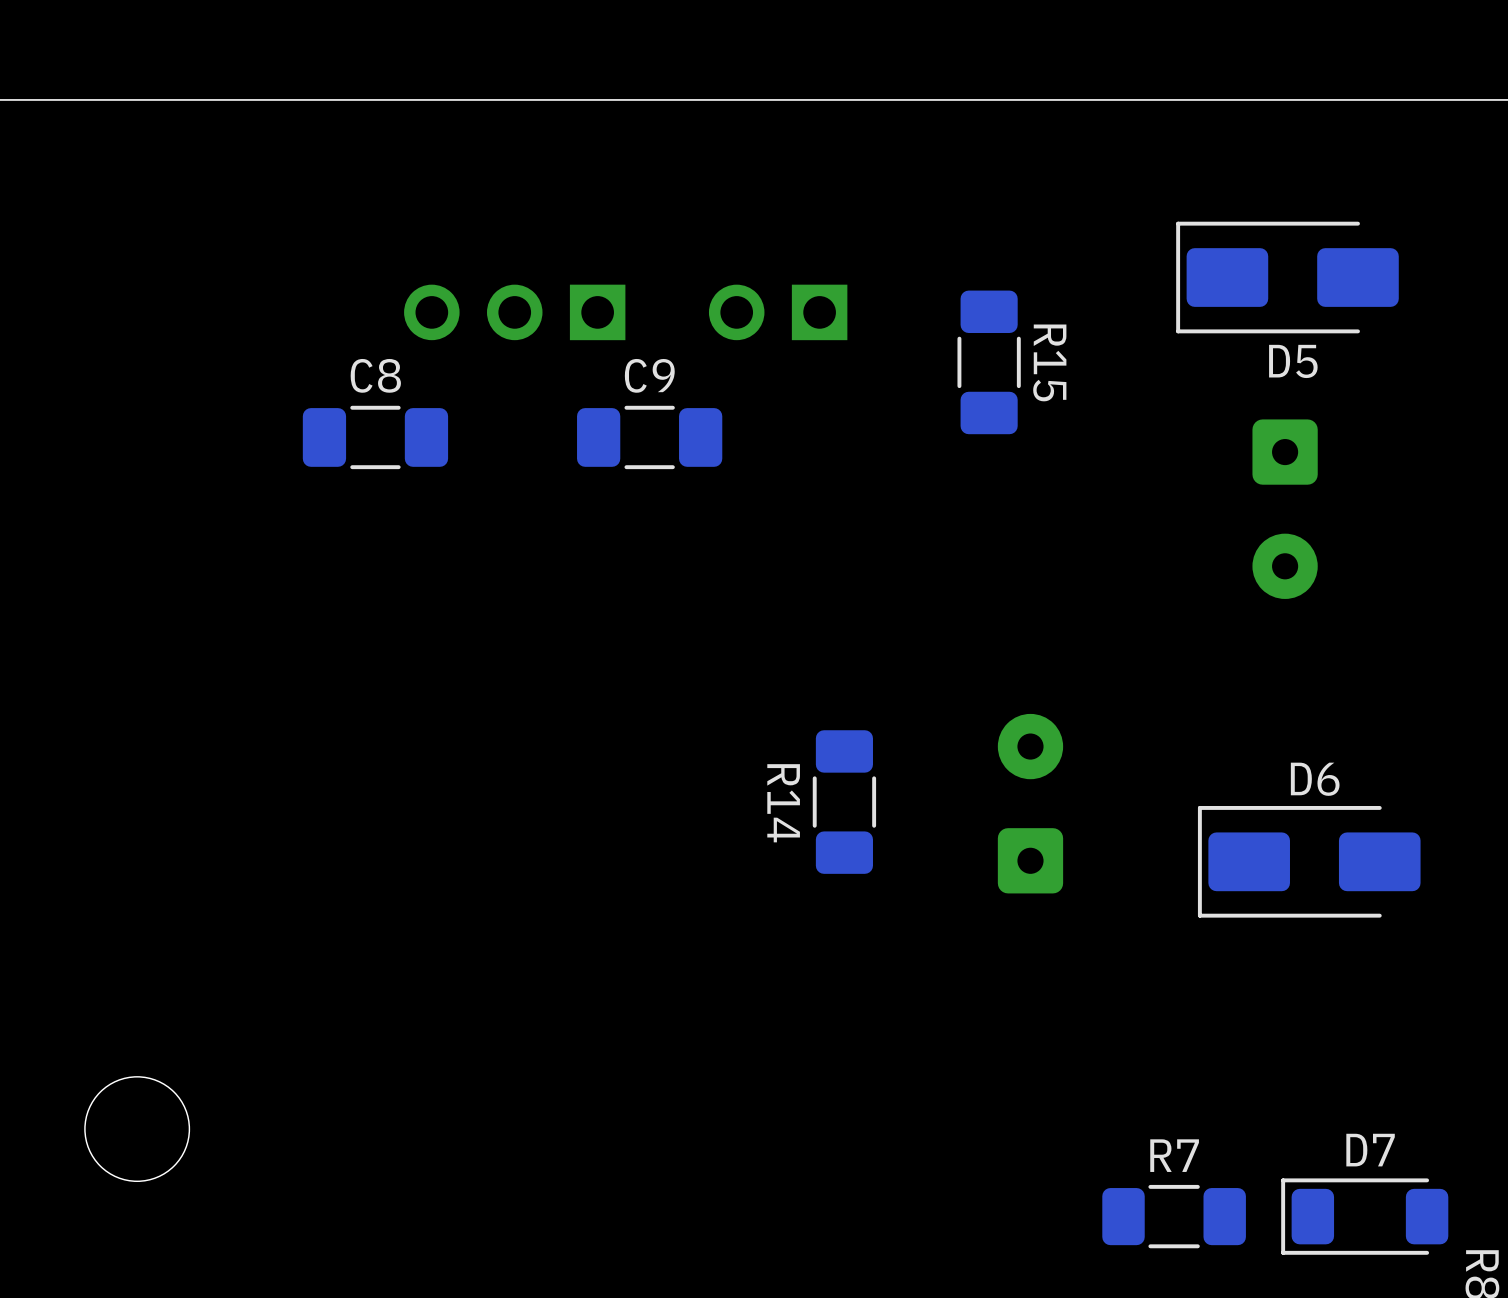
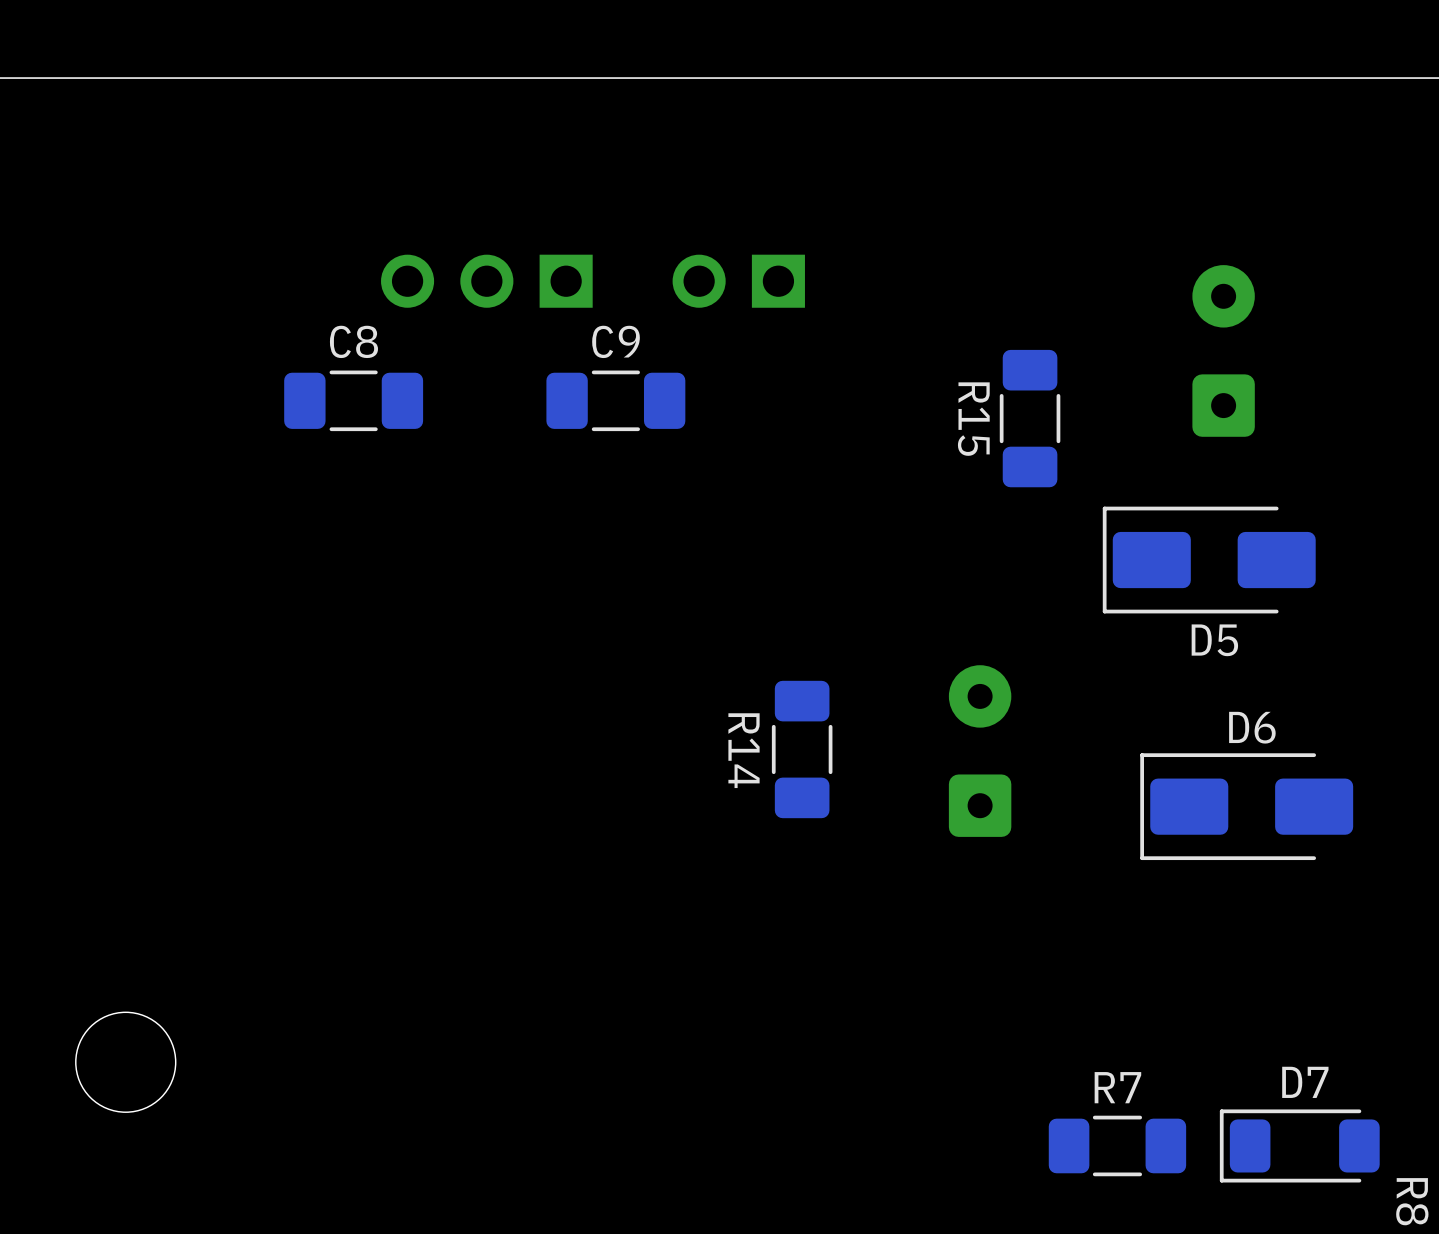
D5 position: (1287, 277) -> (1209, 560)
R15 position: (989, 362) -> (1030, 418)
R15 name position: R15 (1049, 362) -> R15 (973, 419)
part rotation: 0° (1285, 509) -> 180° (1223, 350)
part position: (1285, 509) -> (1223, 350)

